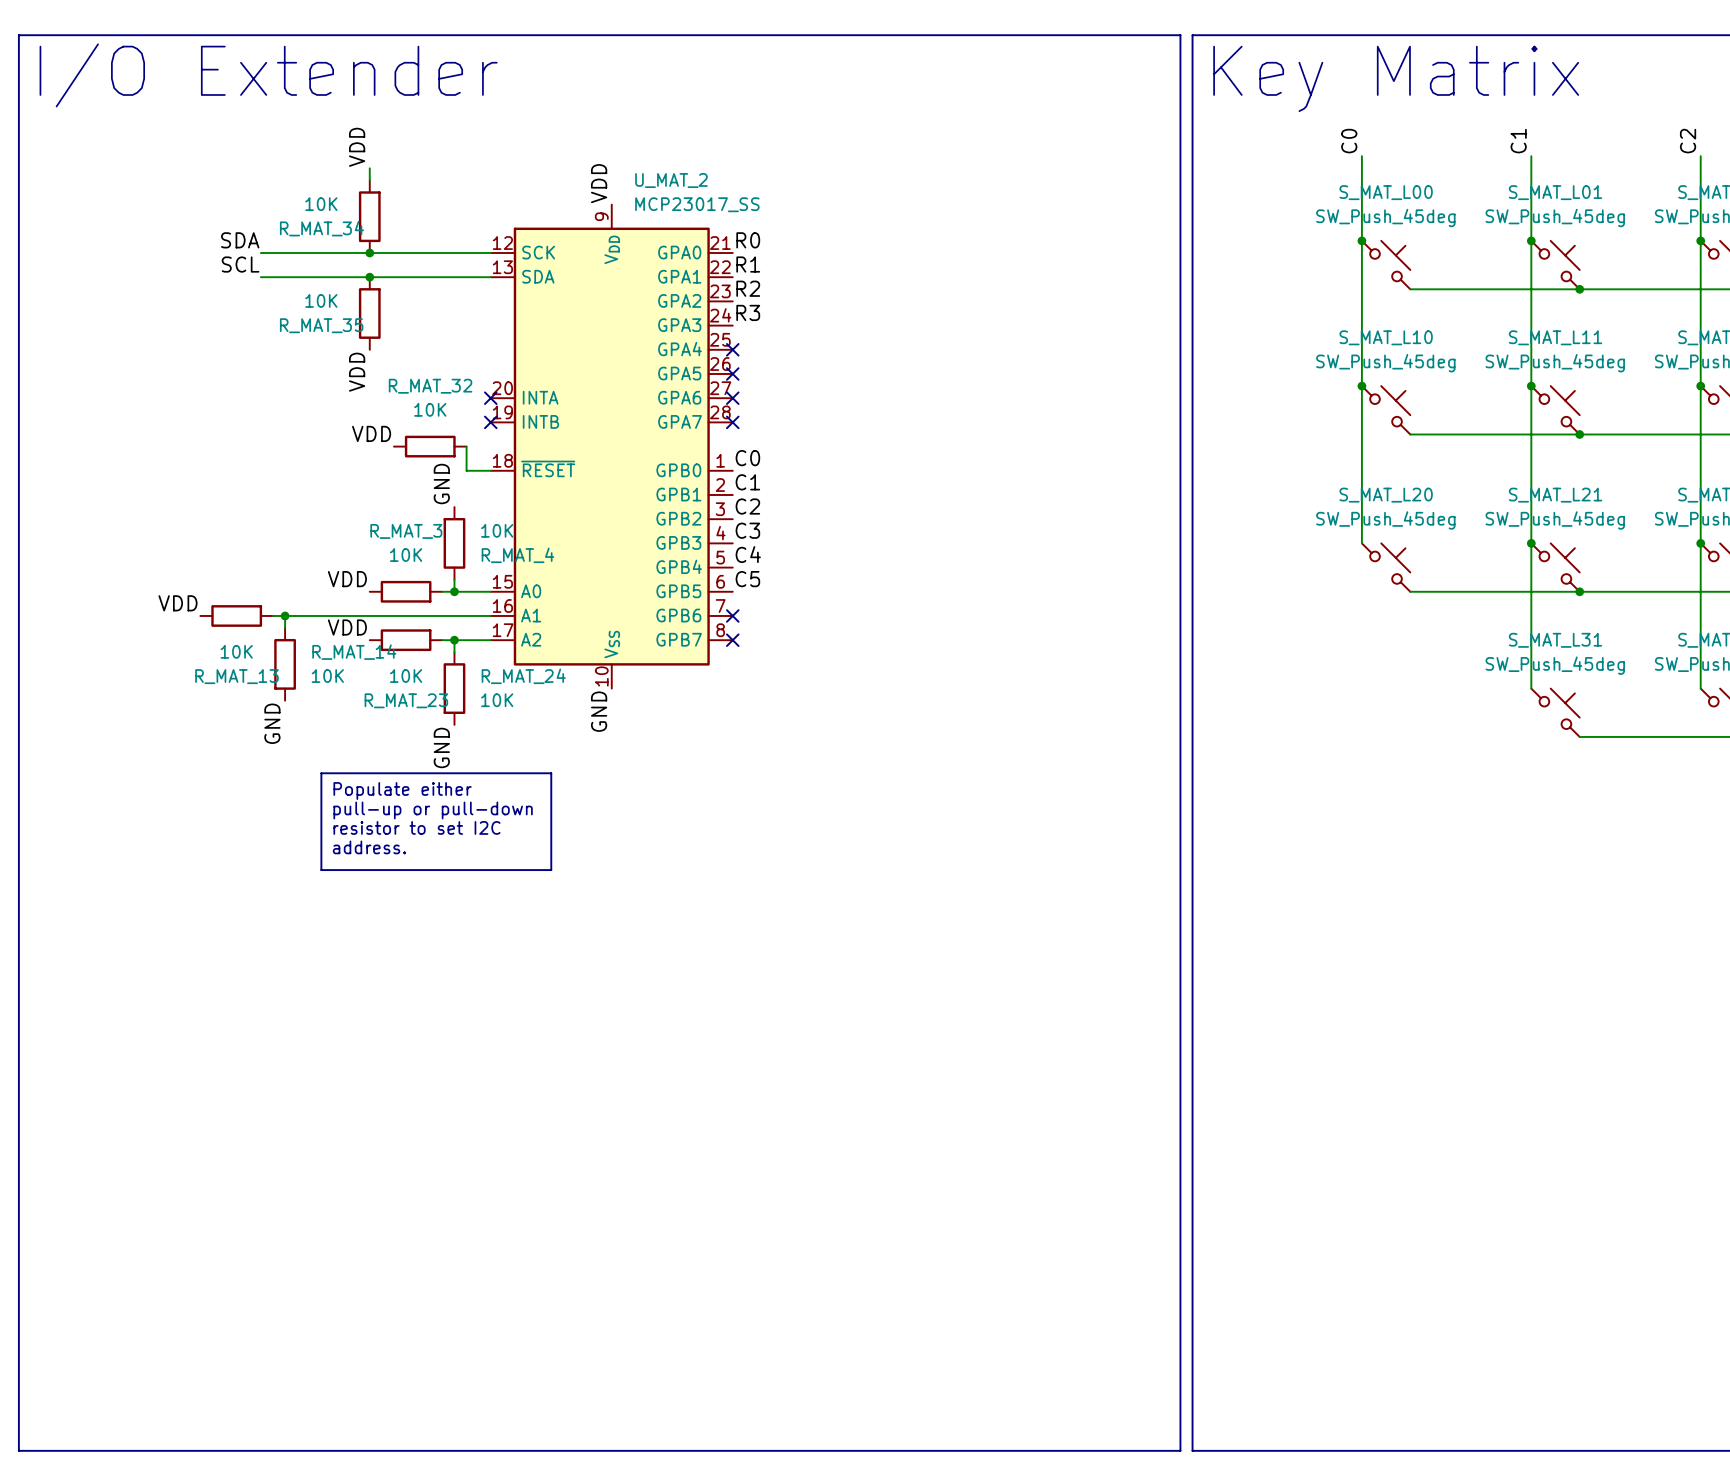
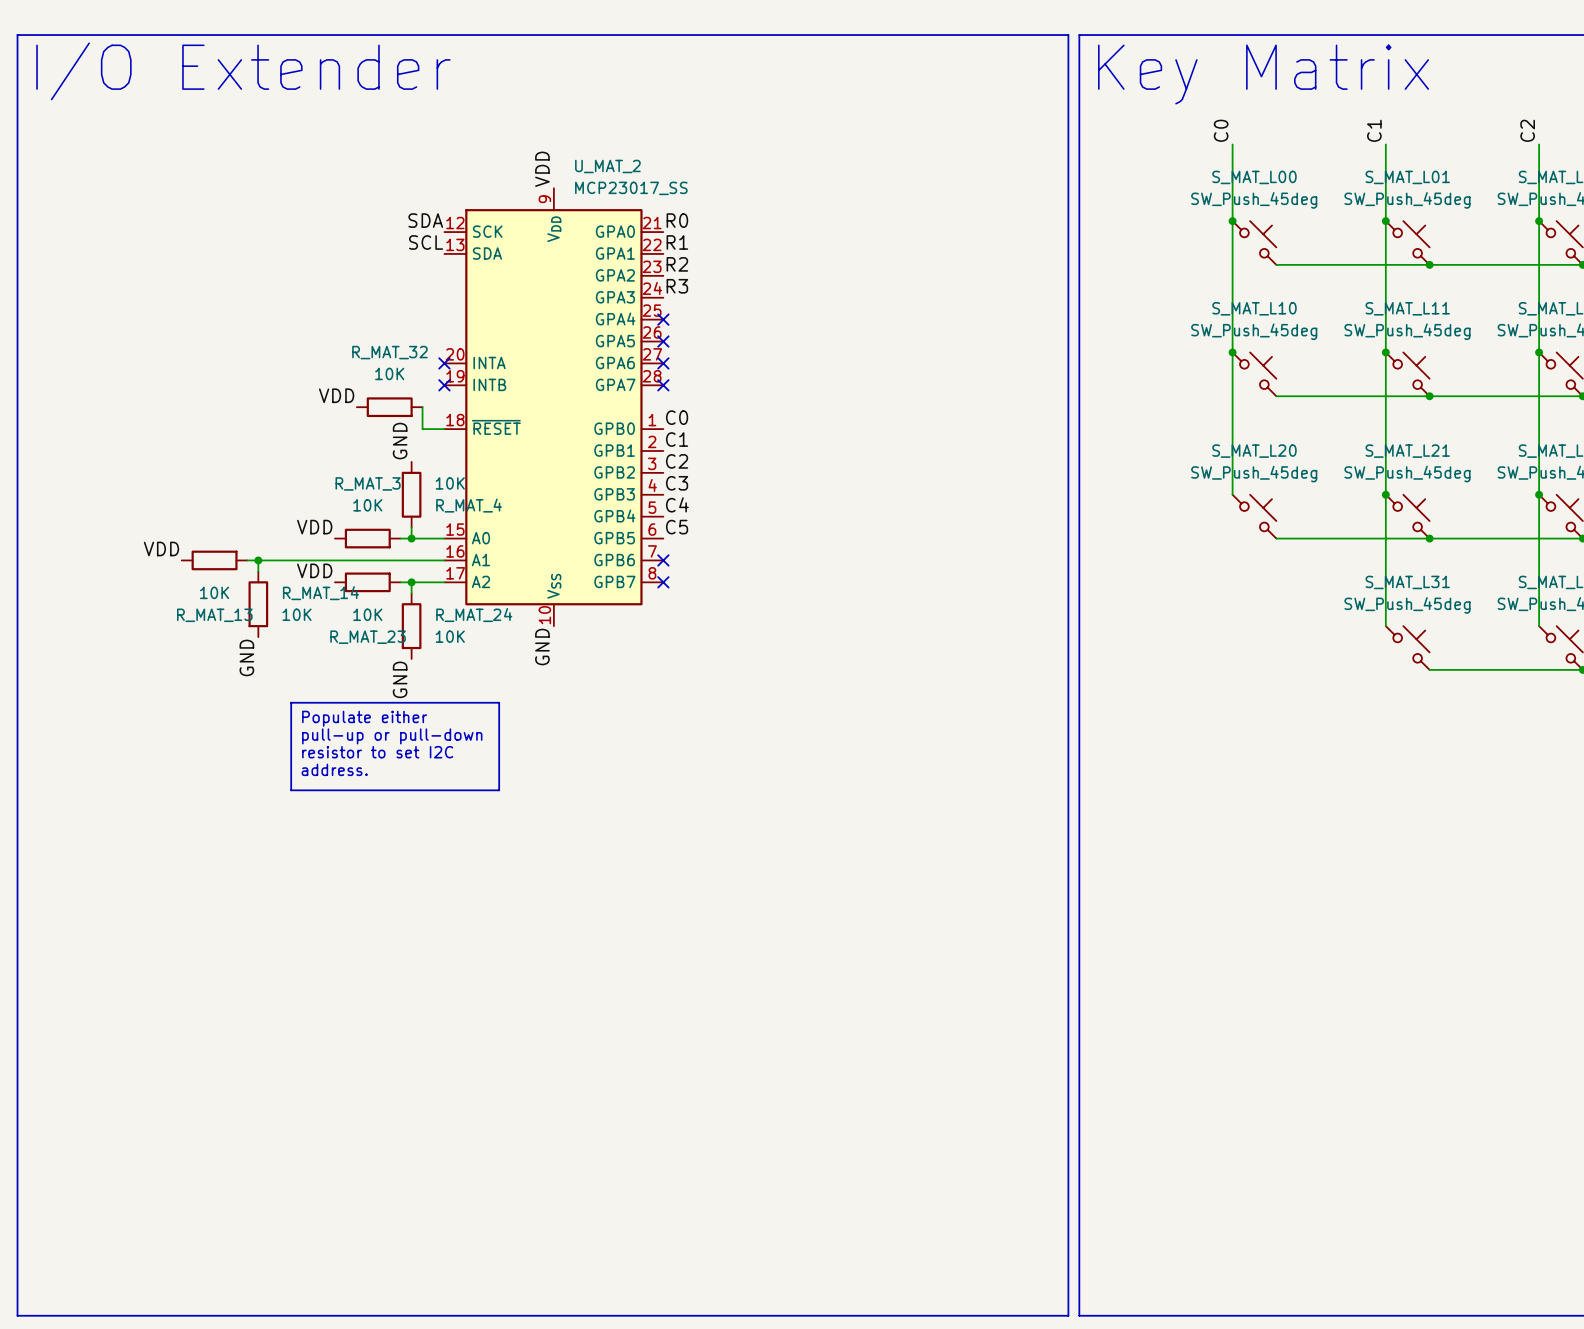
label: VDD (357, 147) -> none
wire: (369, 168) (369, 180) -> none
R_MAT_34: 10K (369, 216) -> none
label position: SDA (240, 240) -> SDA (425, 220)
wire: (260, 253) (490, 253) -> none
junction: (369, 253) -> none
label position: SCL (240, 264) -> SCL (426, 242)
wire: (260, 277) (490, 277) -> none
junction: (369, 277) -> none
R_MAT_35: 10K (369, 313) -> none
label: VDD (357, 372) -> none

